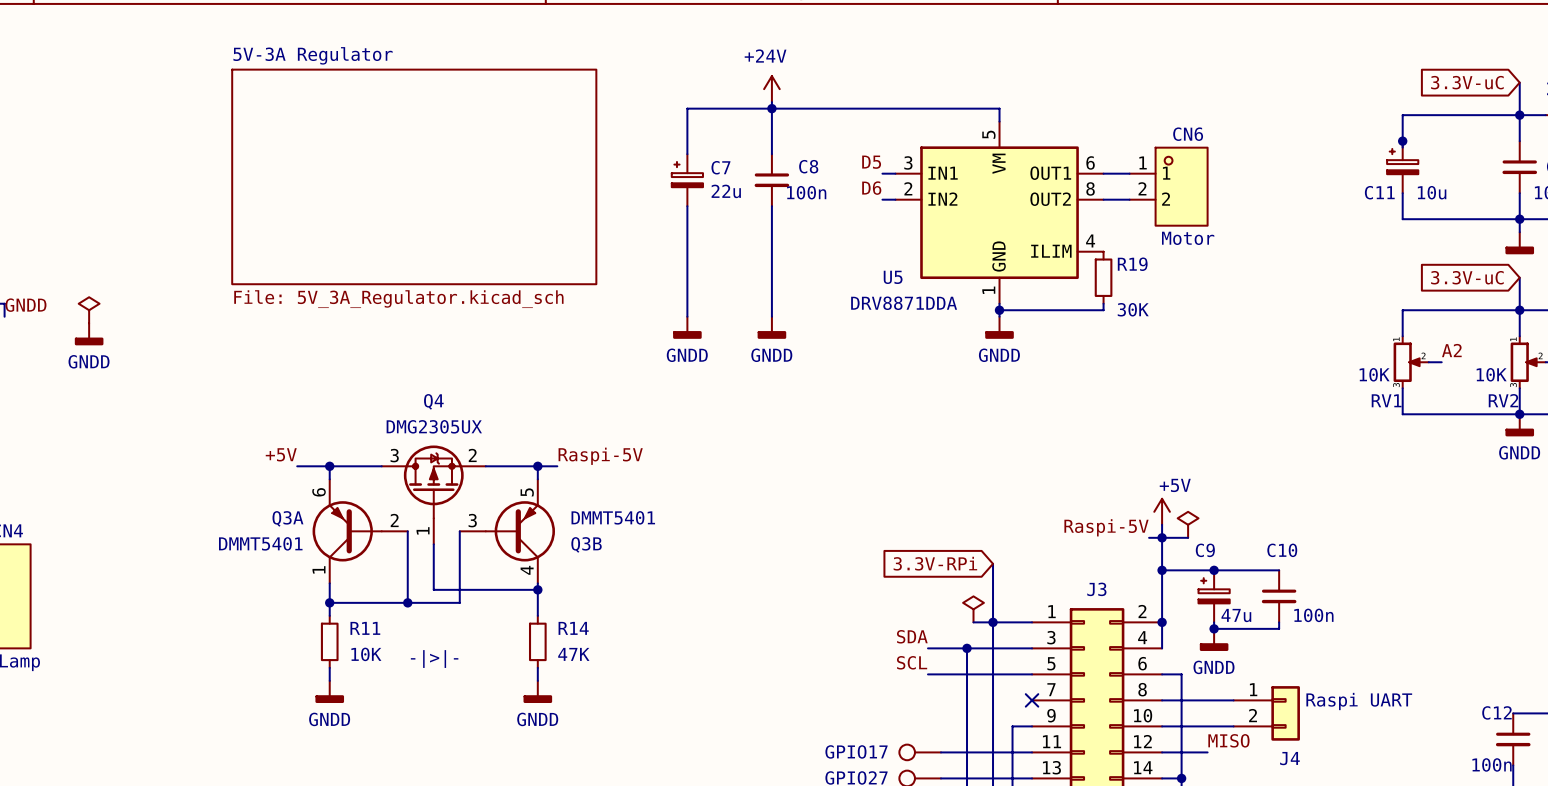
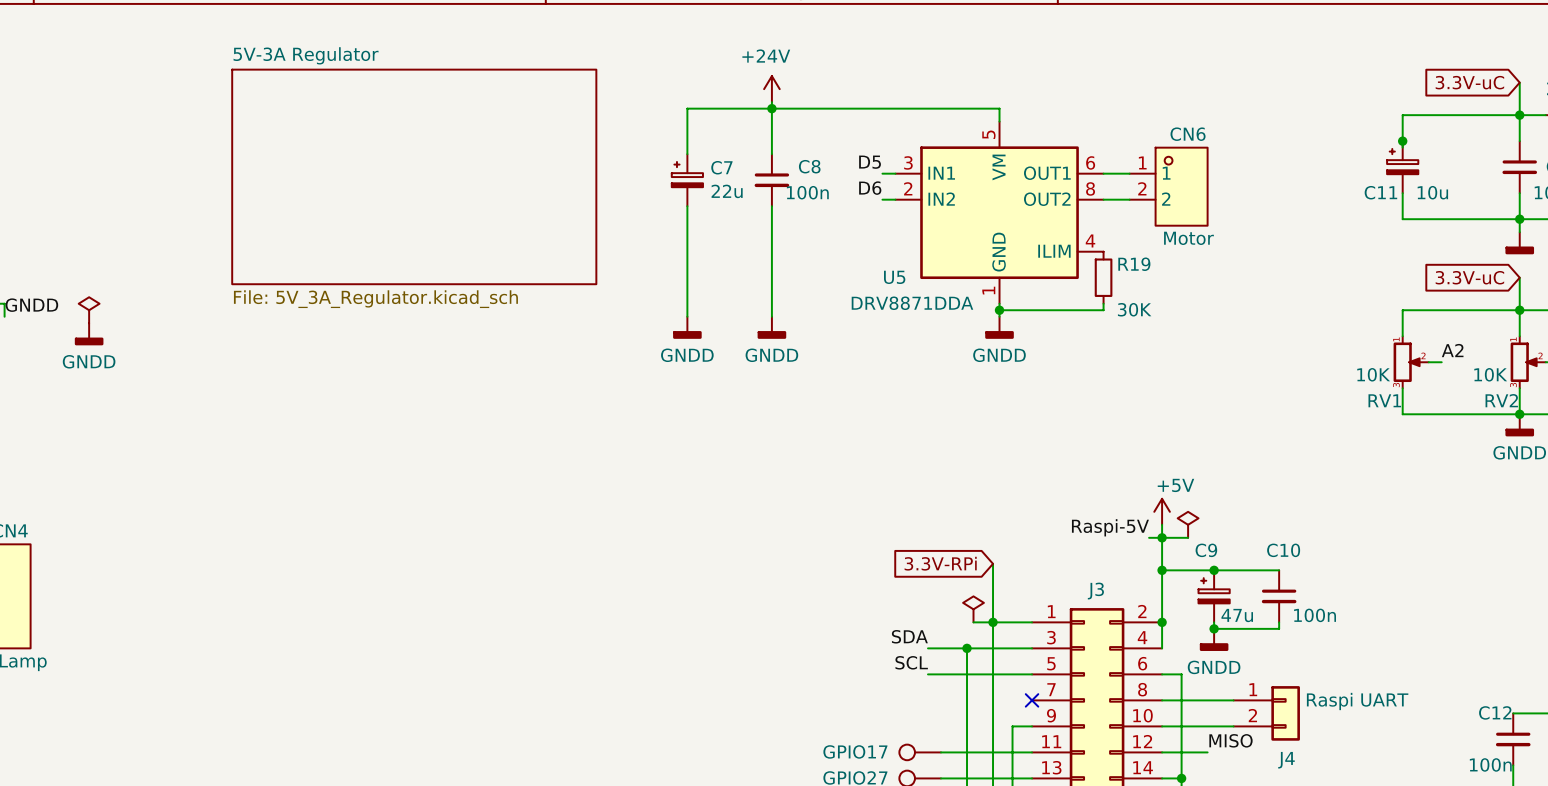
label: +5V (281, 454) -> none
label: Raspi-5V (600, 456) -> none
wire: (297, 466) (381, 466) -> none
wire: (329, 466) (329, 479) -> none
junction: (329, 466) -> none
wire: (485, 466) (557, 466) -> none
wire: (537, 466) (537, 479) -> none
junction: (537, 466) -> none
Q4: DMG2305UX (433, 494) -> none
Q3A: DMMT5401 (360, 531) -> none
wire: (407, 531) (407, 602) -> none
wire: (459, 531) (459, 602) (329, 602) -> none
Q3B: DMMT5401 (507, 531) -> none
wire: (433, 544) (433, 589) (537, 589) -> none
wire: (329, 583) (329, 615) -> none
wire: (537, 583) (537, 615) -> none
junction: (537, 589) -> none
junction: (329, 602) -> none
junction: (407, 602) -> none
R11: 10K (329, 641) -> none
R14: 47K (537, 641) -> none
text: -|>|- (434, 659) -> none
wire: (329, 667) (329, 680) -> none
wire: (537, 667) (537, 680) -> none
power symbol: GNDD (329, 691) -> none
power symbol: GNDD (537, 691) -> none

